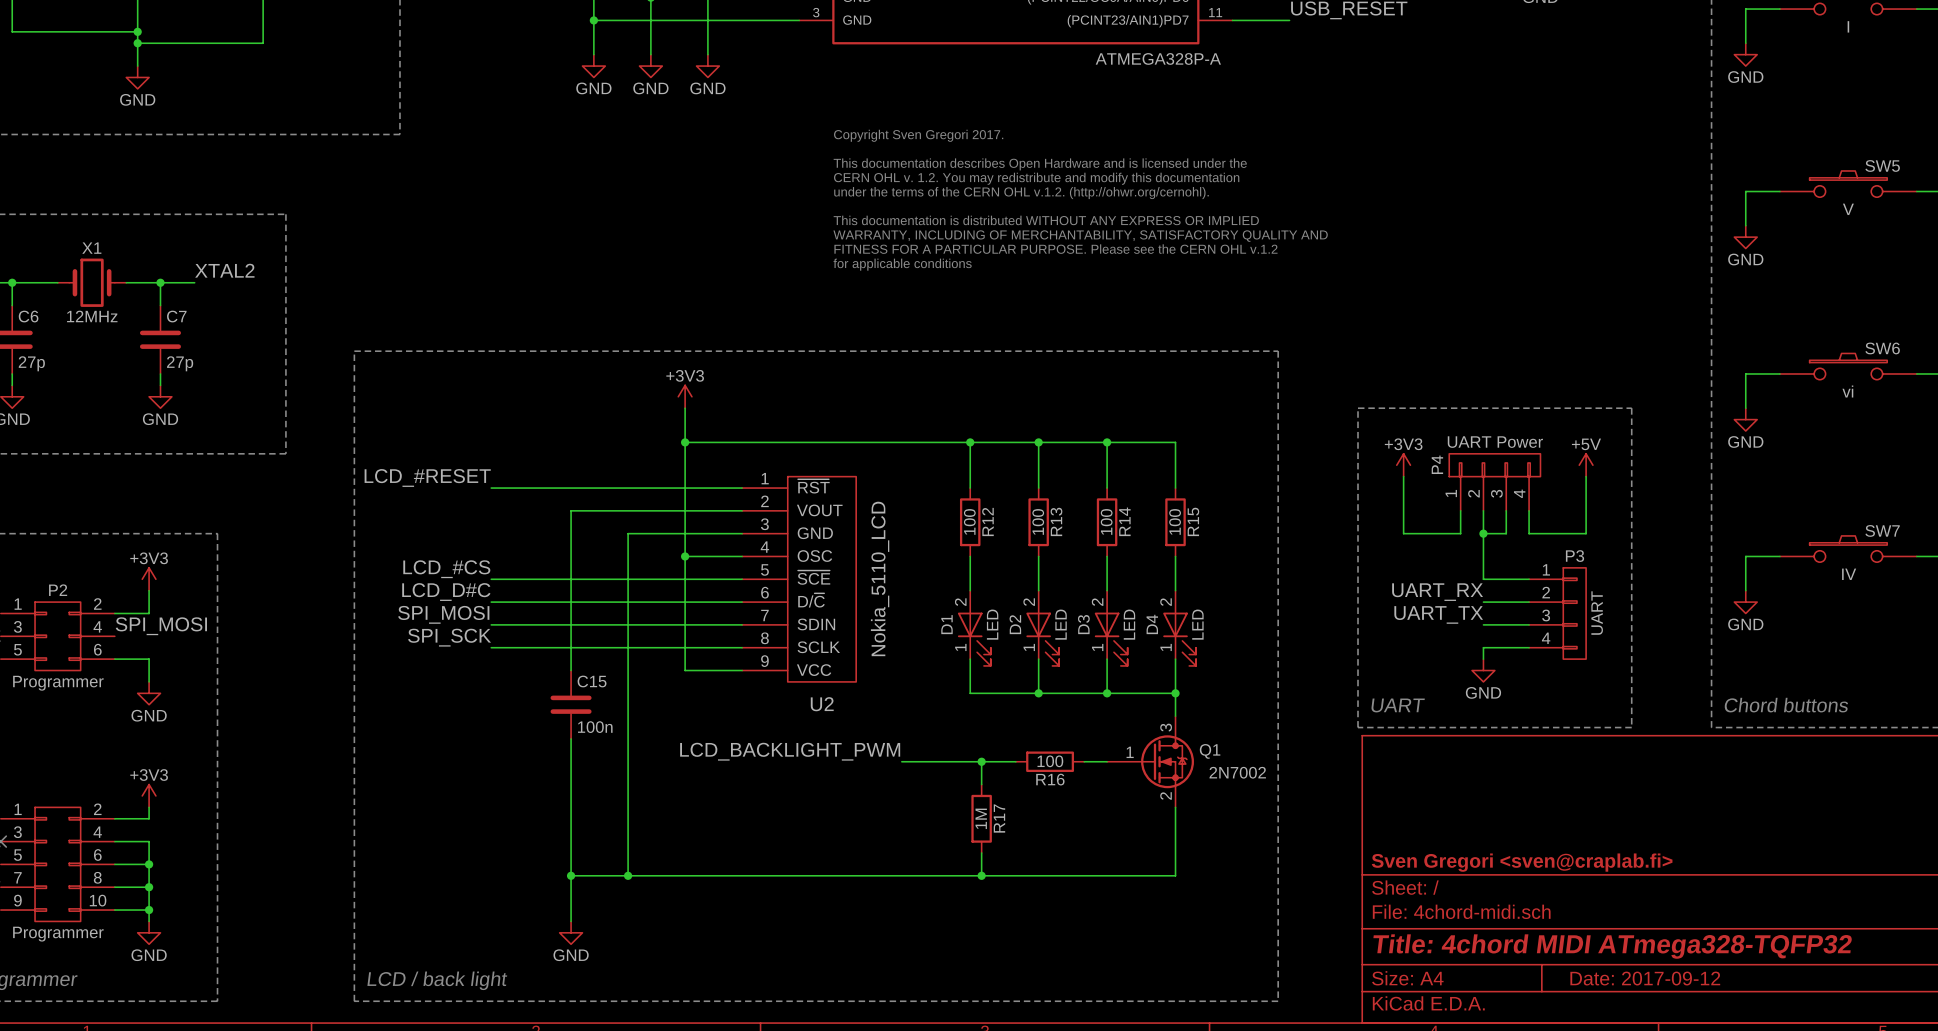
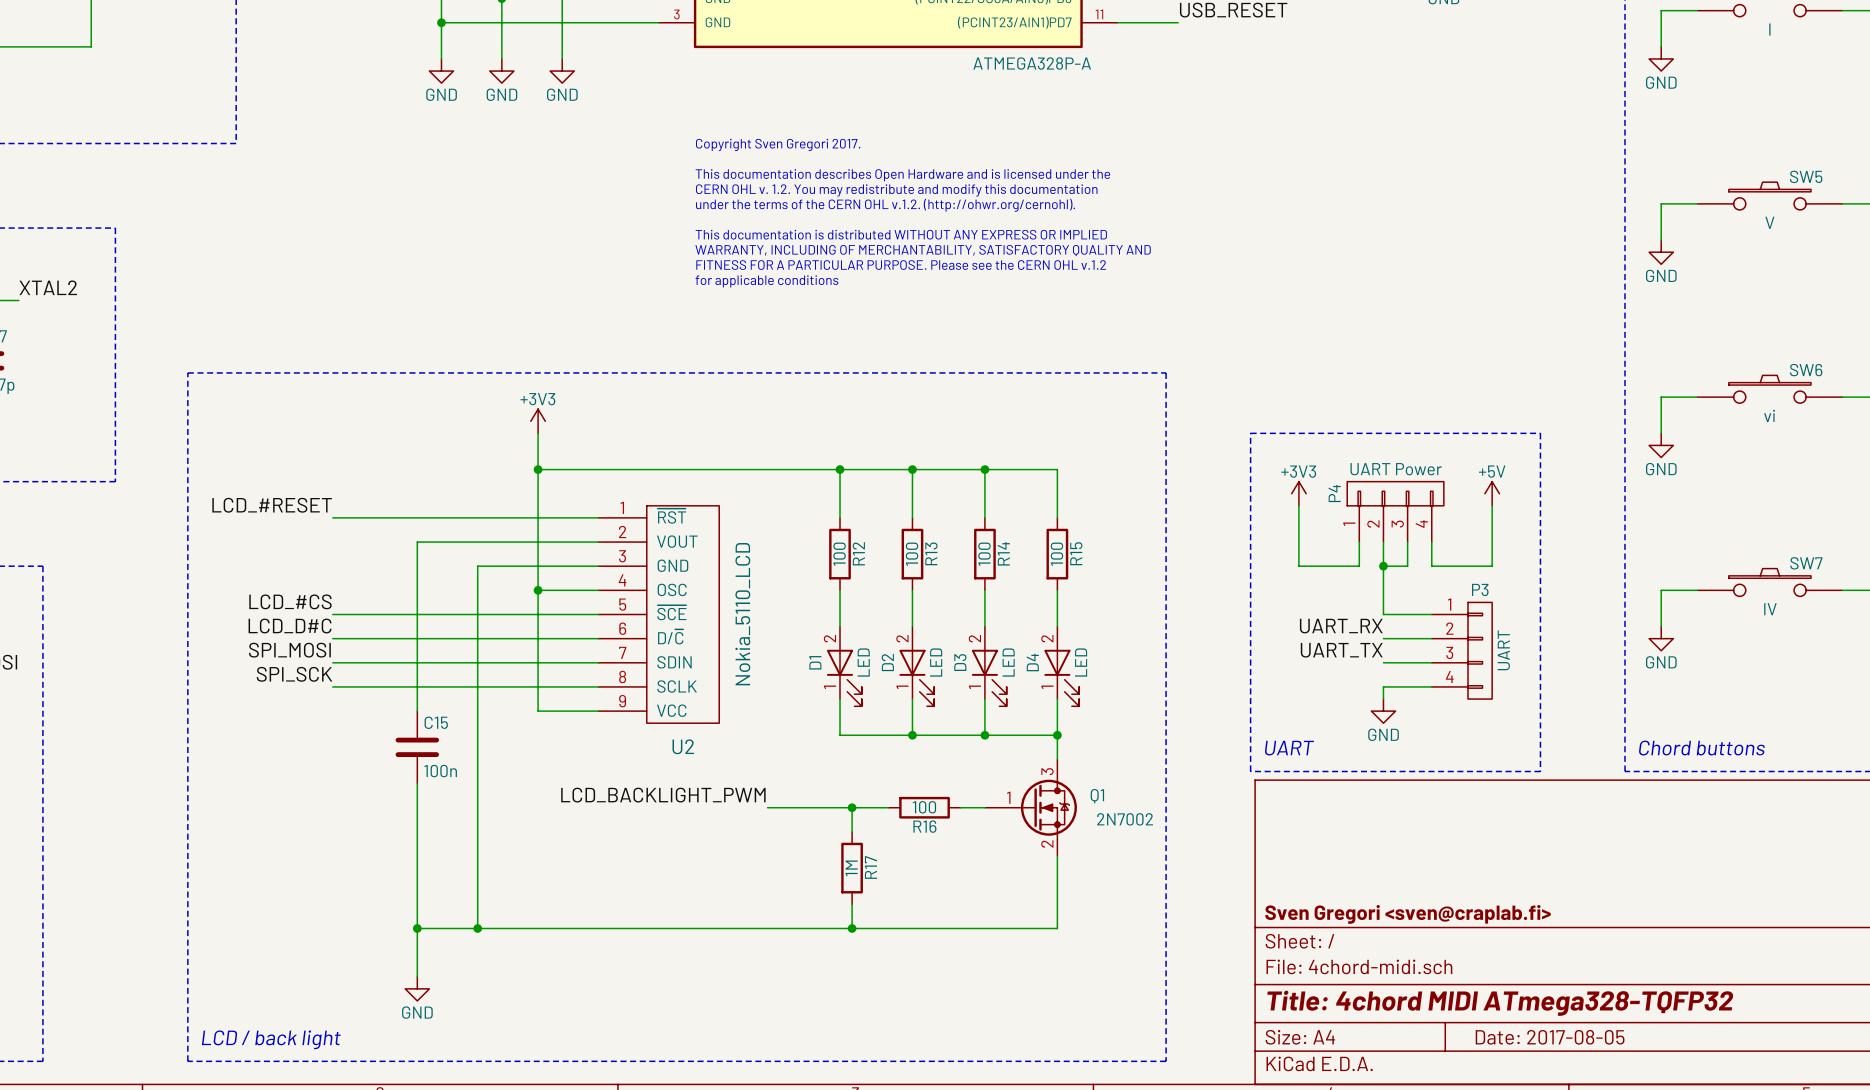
title block: Date: 2017-09-12 (1645, 978) -> Date: 2017-08-05 (1550, 1037)

